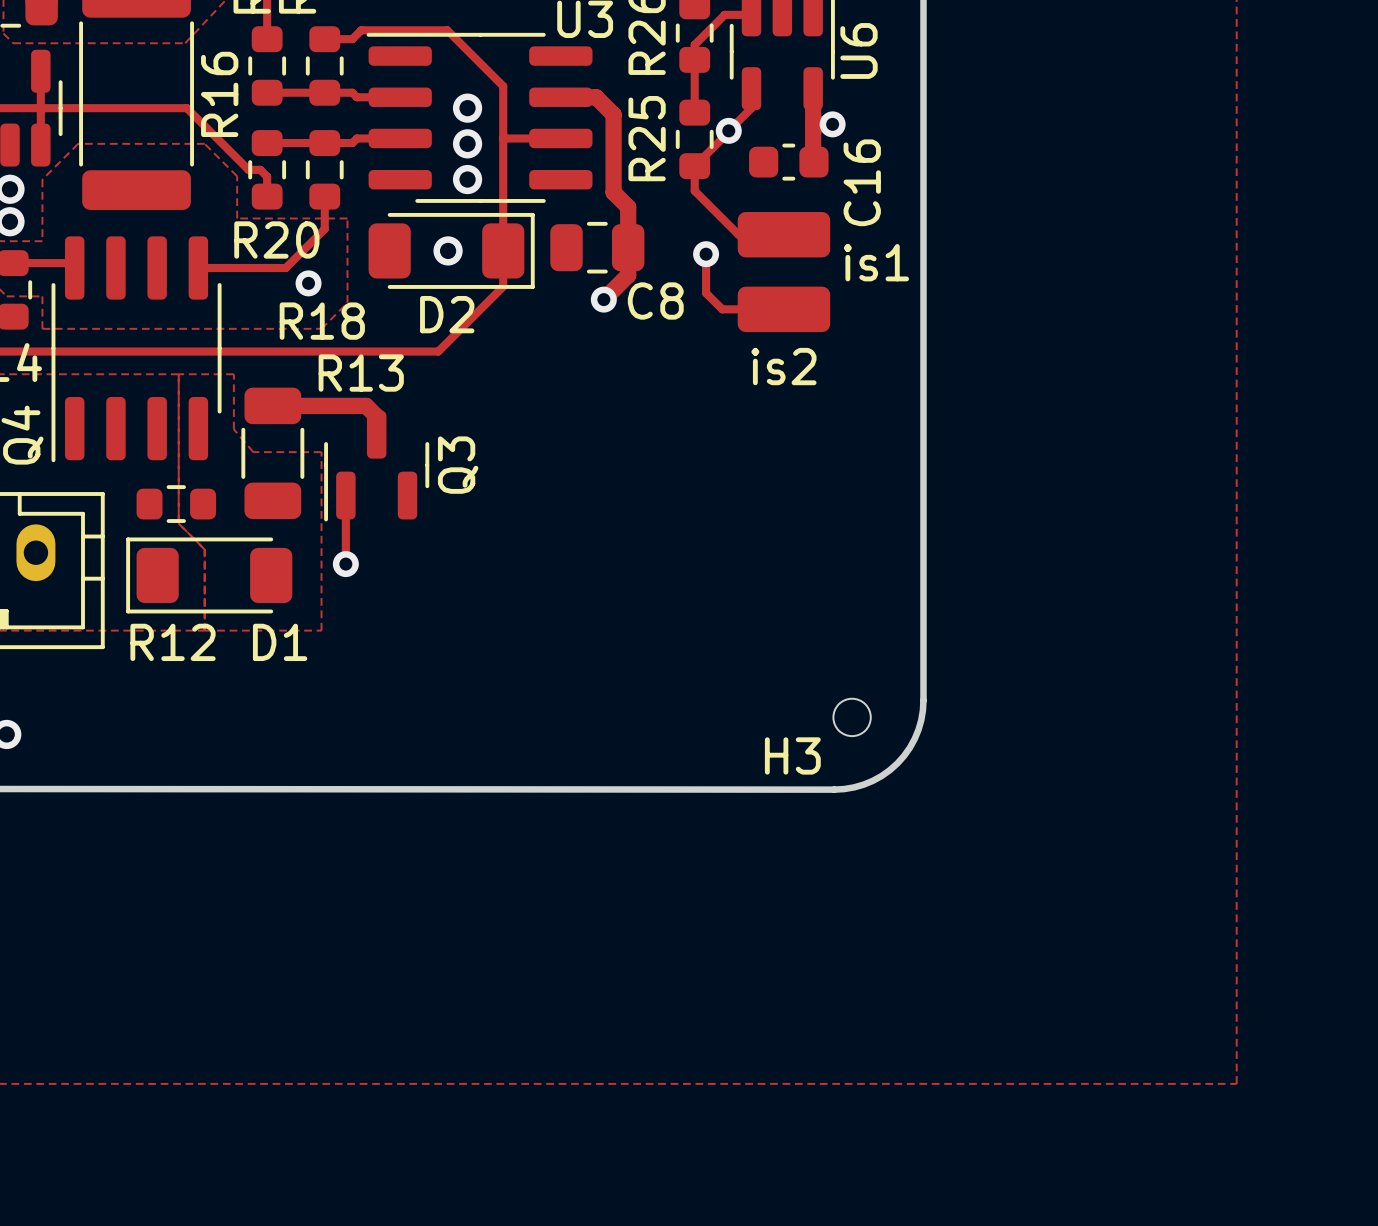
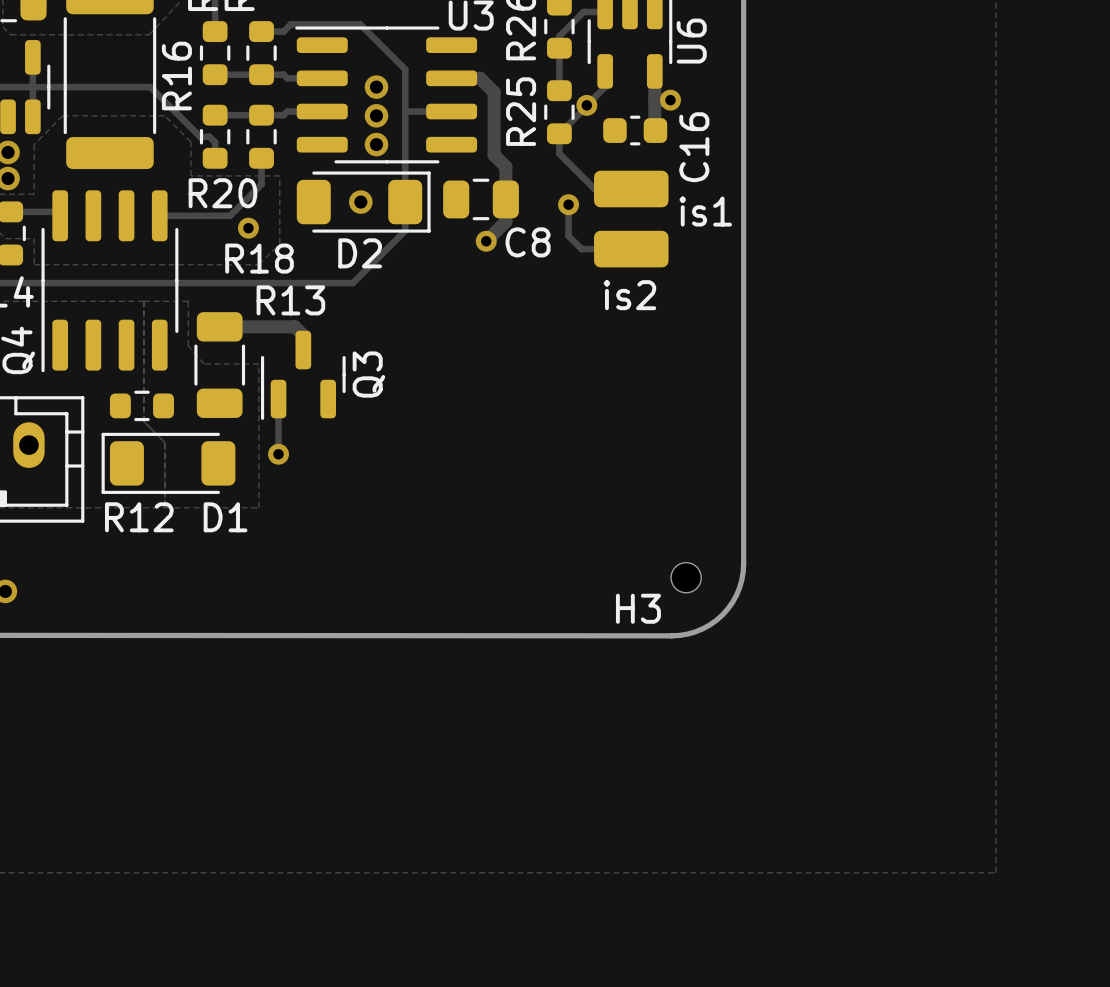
text: none -> is2 (629, 295)
is2 name: is2 (783, 366) -> none

